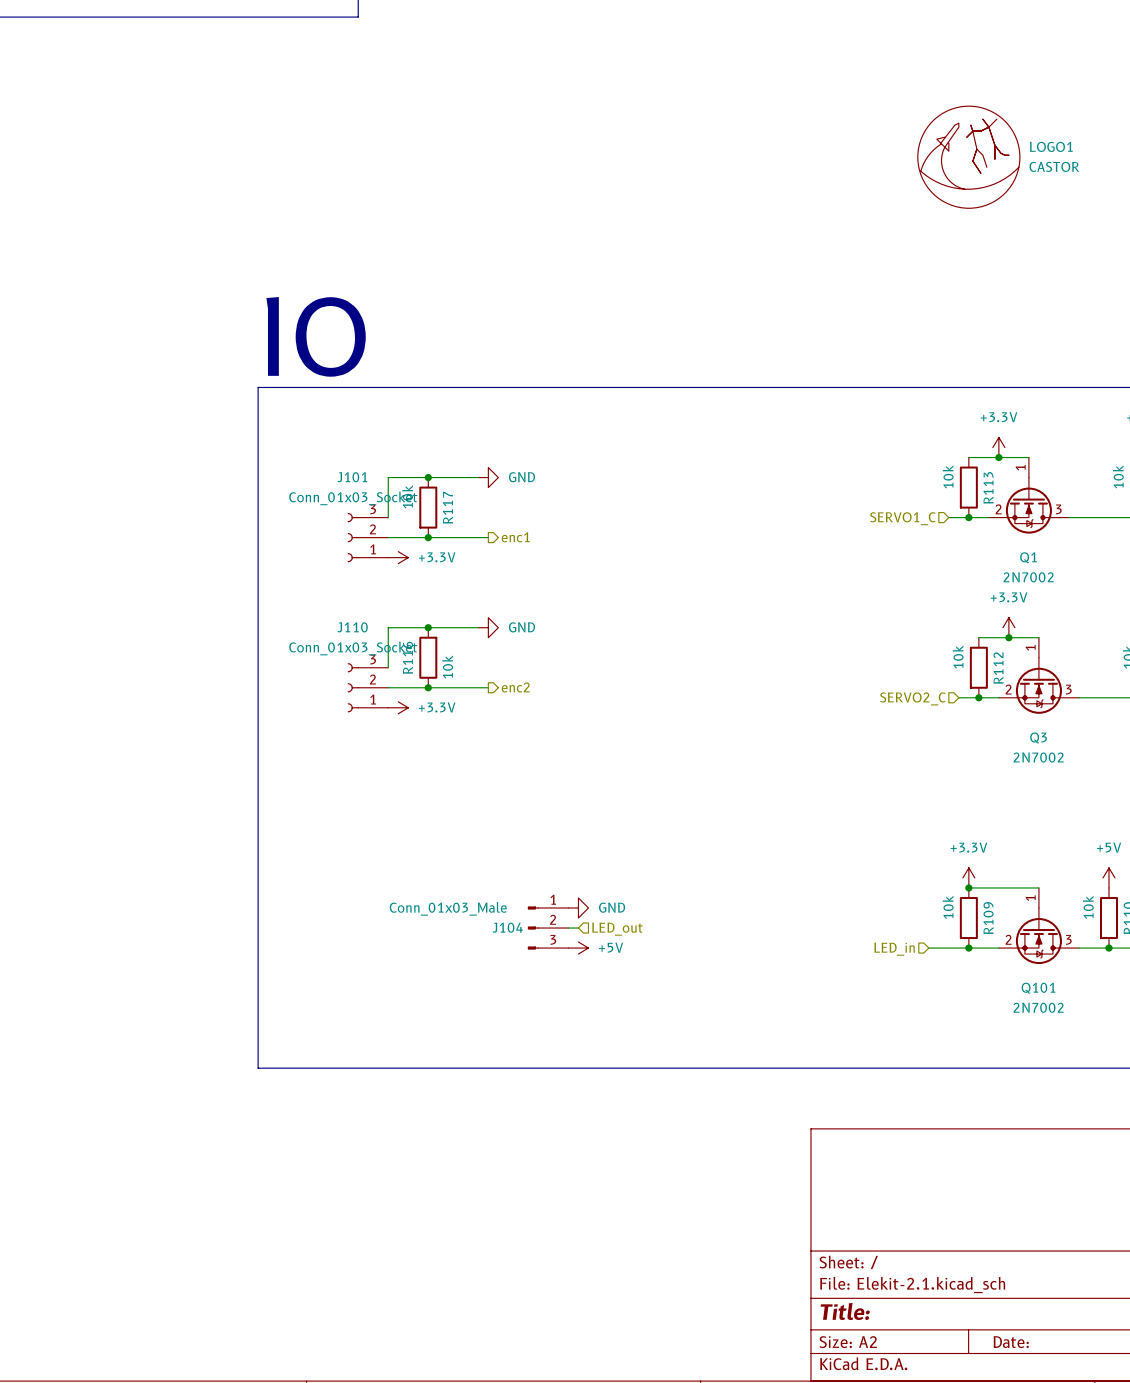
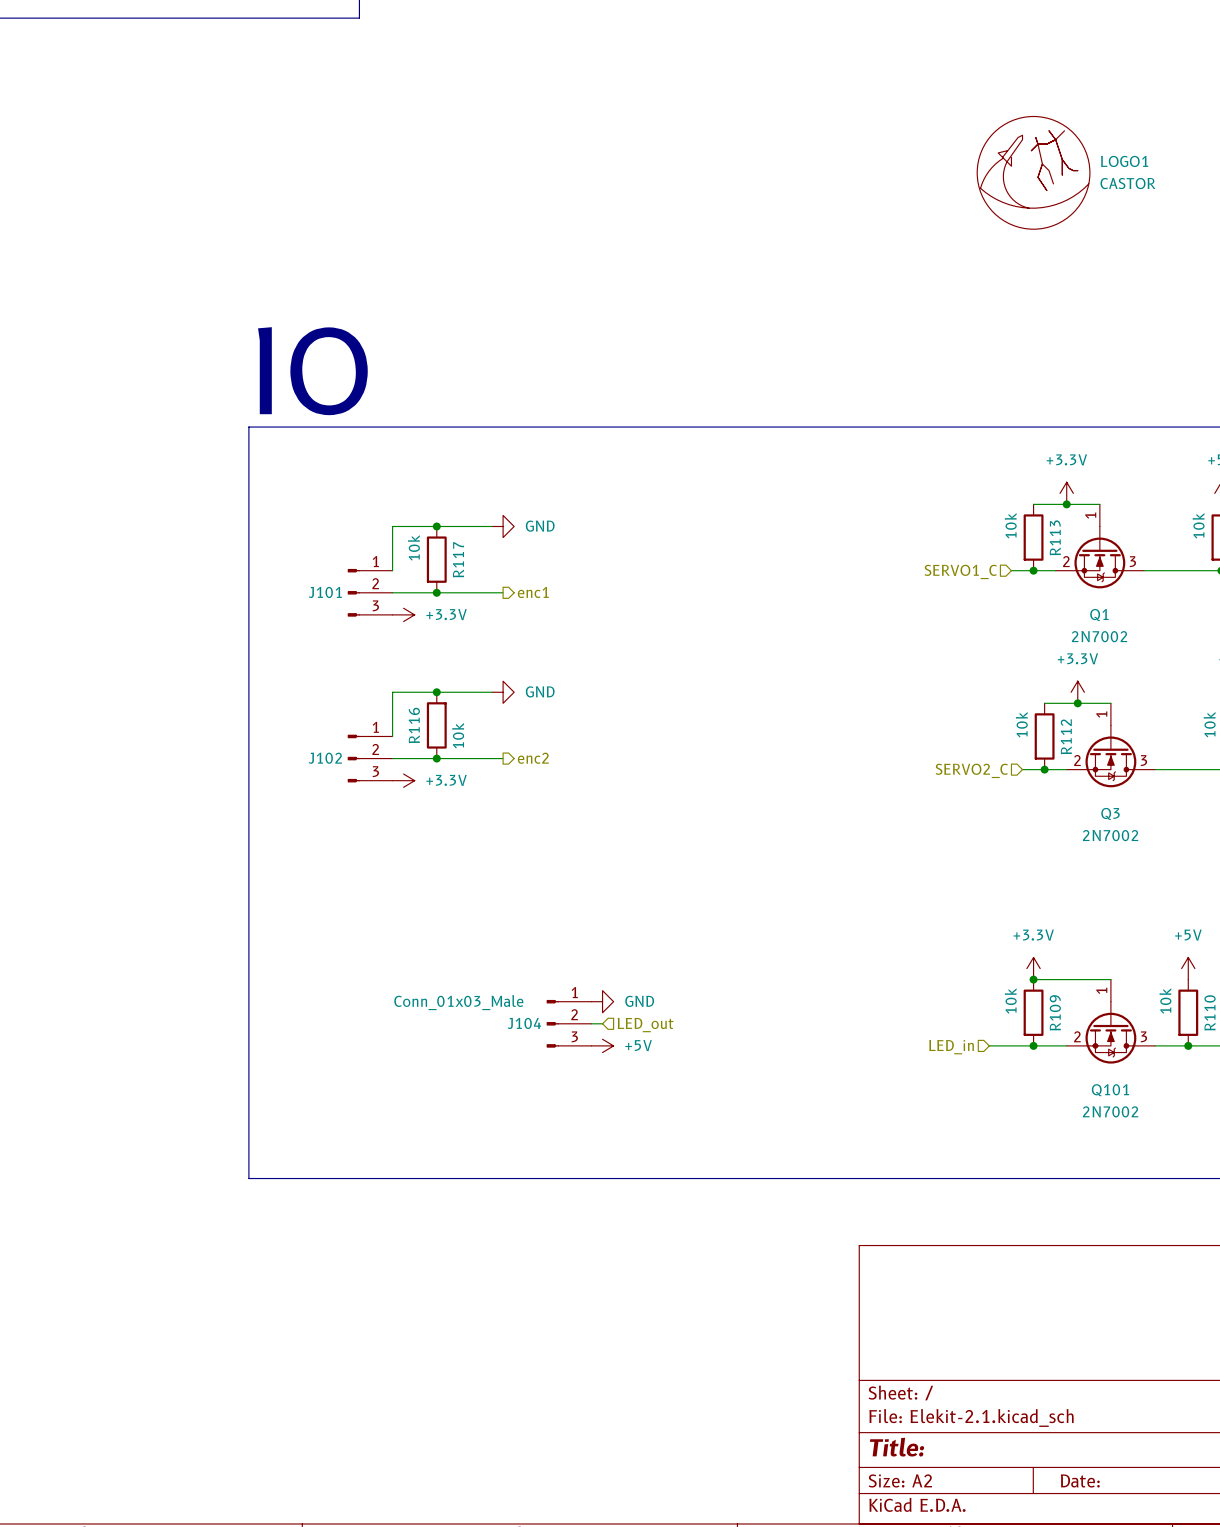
J101 name position: J101 (352, 477) -> J101 (325, 592)
J101 value: Conn_01x03_Socket (353, 498) -> none
J101 symbol: [347, 512, 389, 563] -> [347, 568, 393, 617]
J110: Conn_01x03_Socket (367, 687) -> none
J102: none -> (370, 758)

